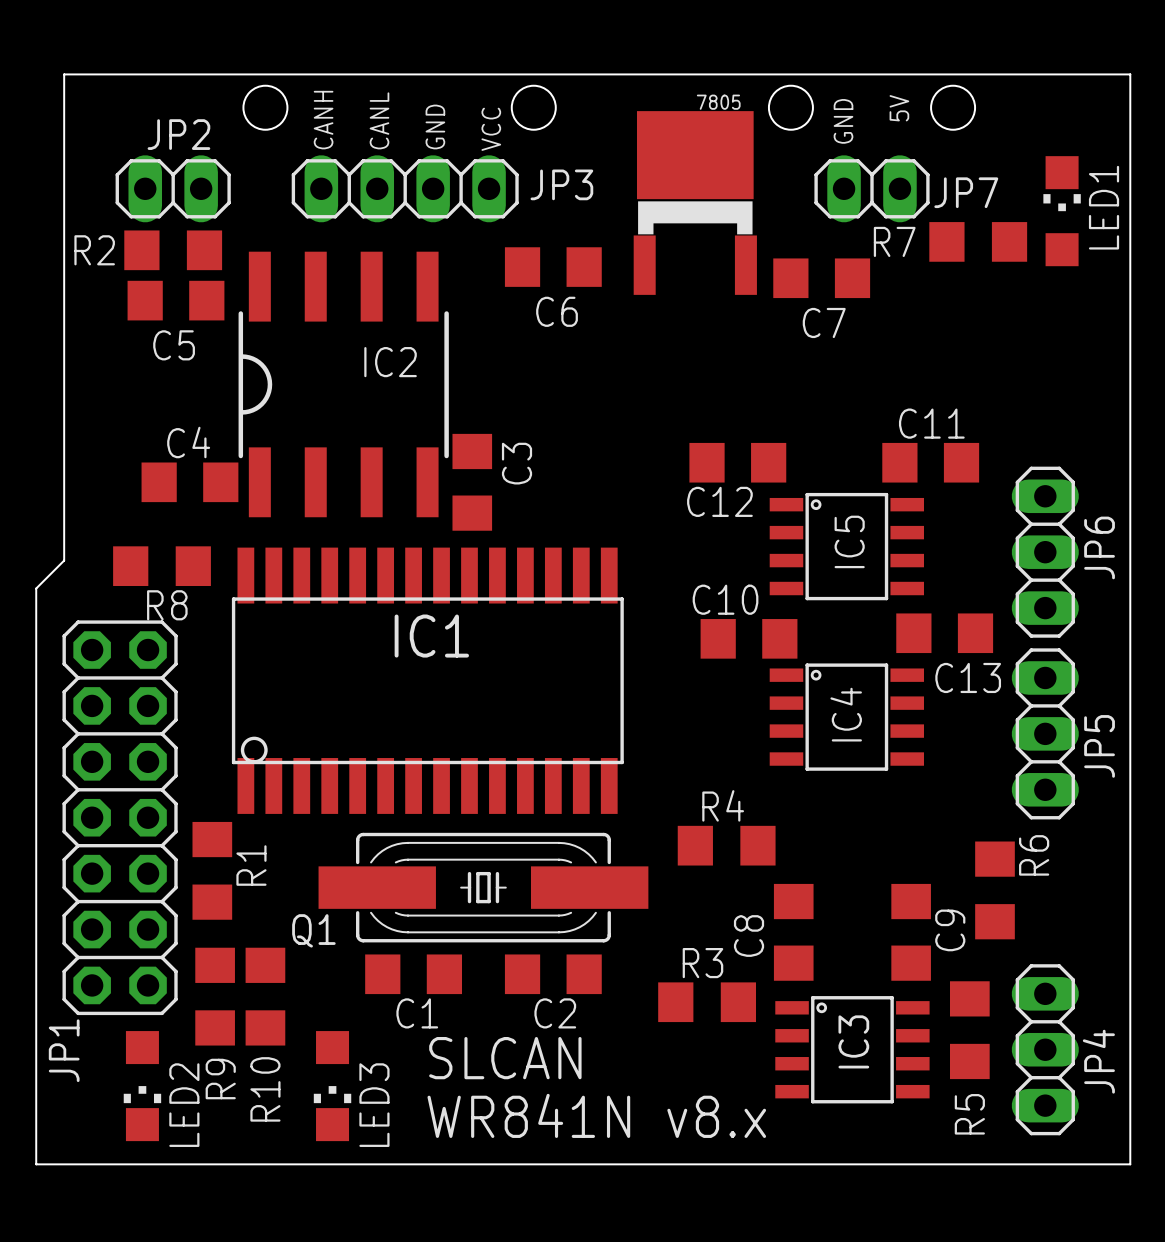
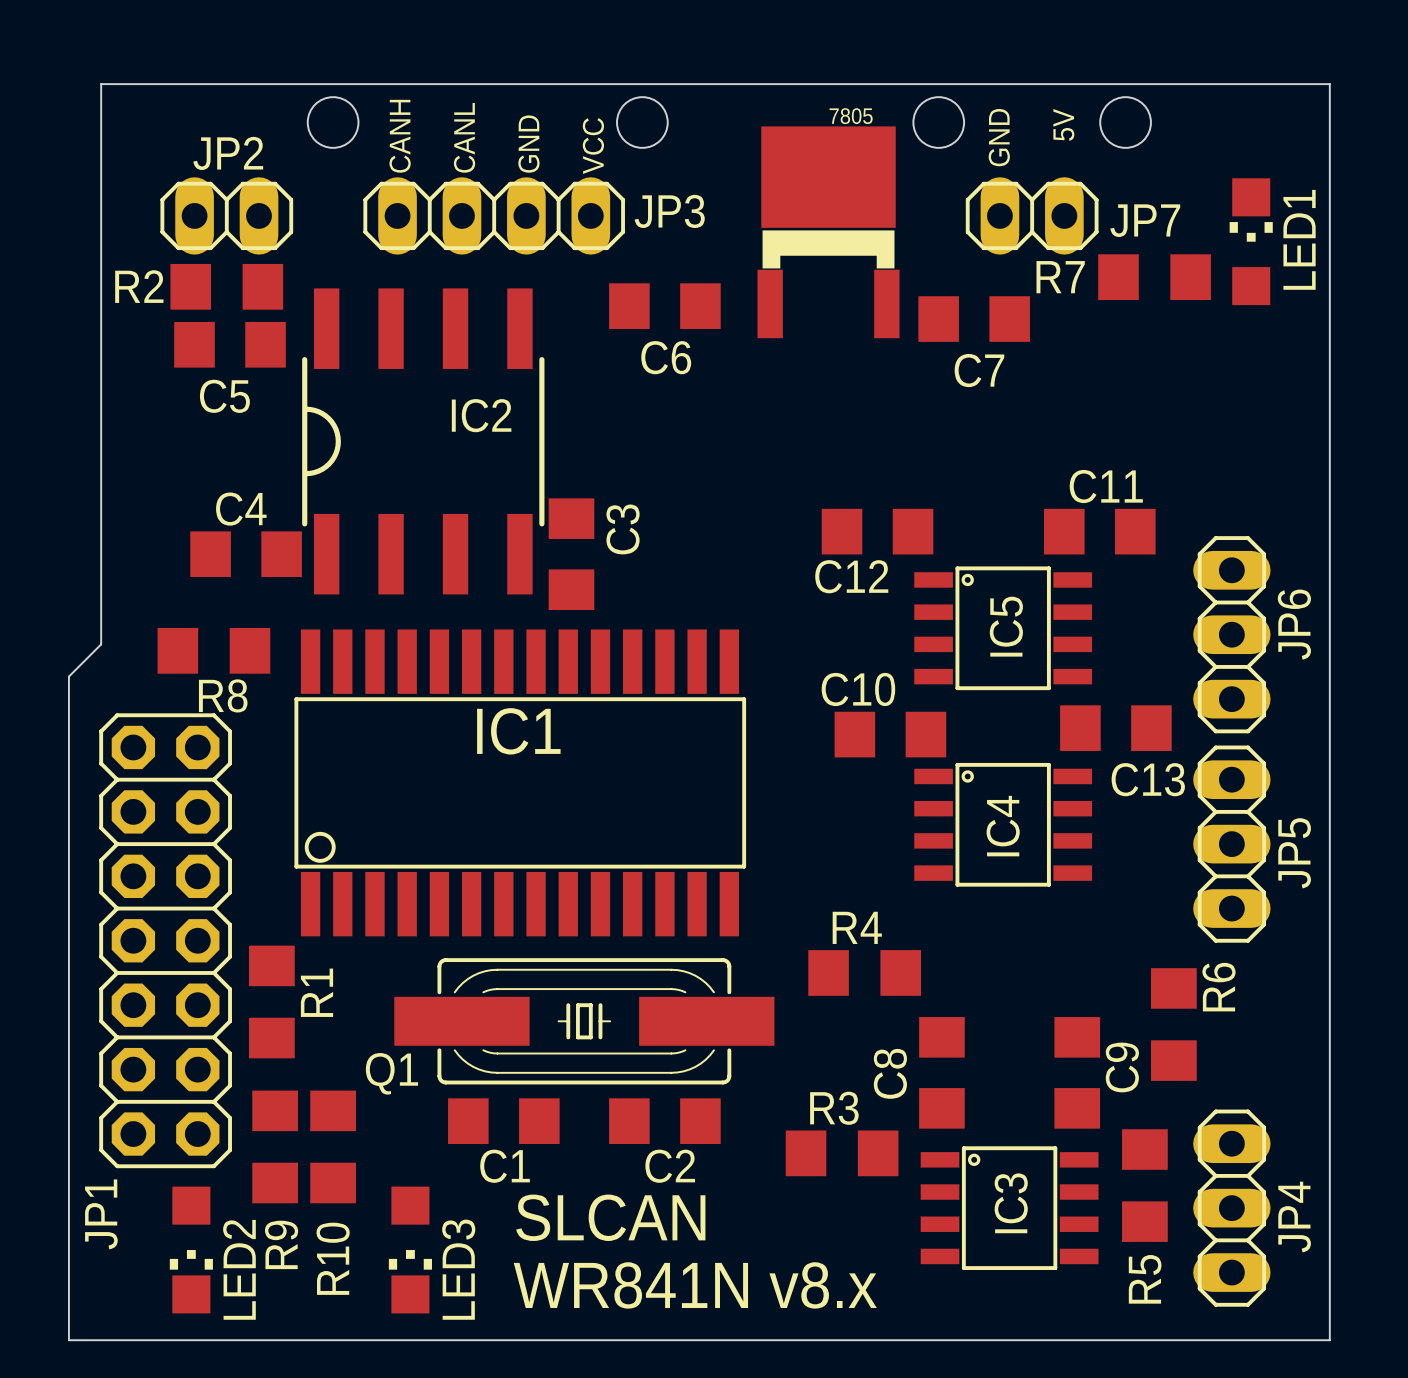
IC1 footprint: [231, 547, 624, 814] -> [294, 629, 747, 937]

